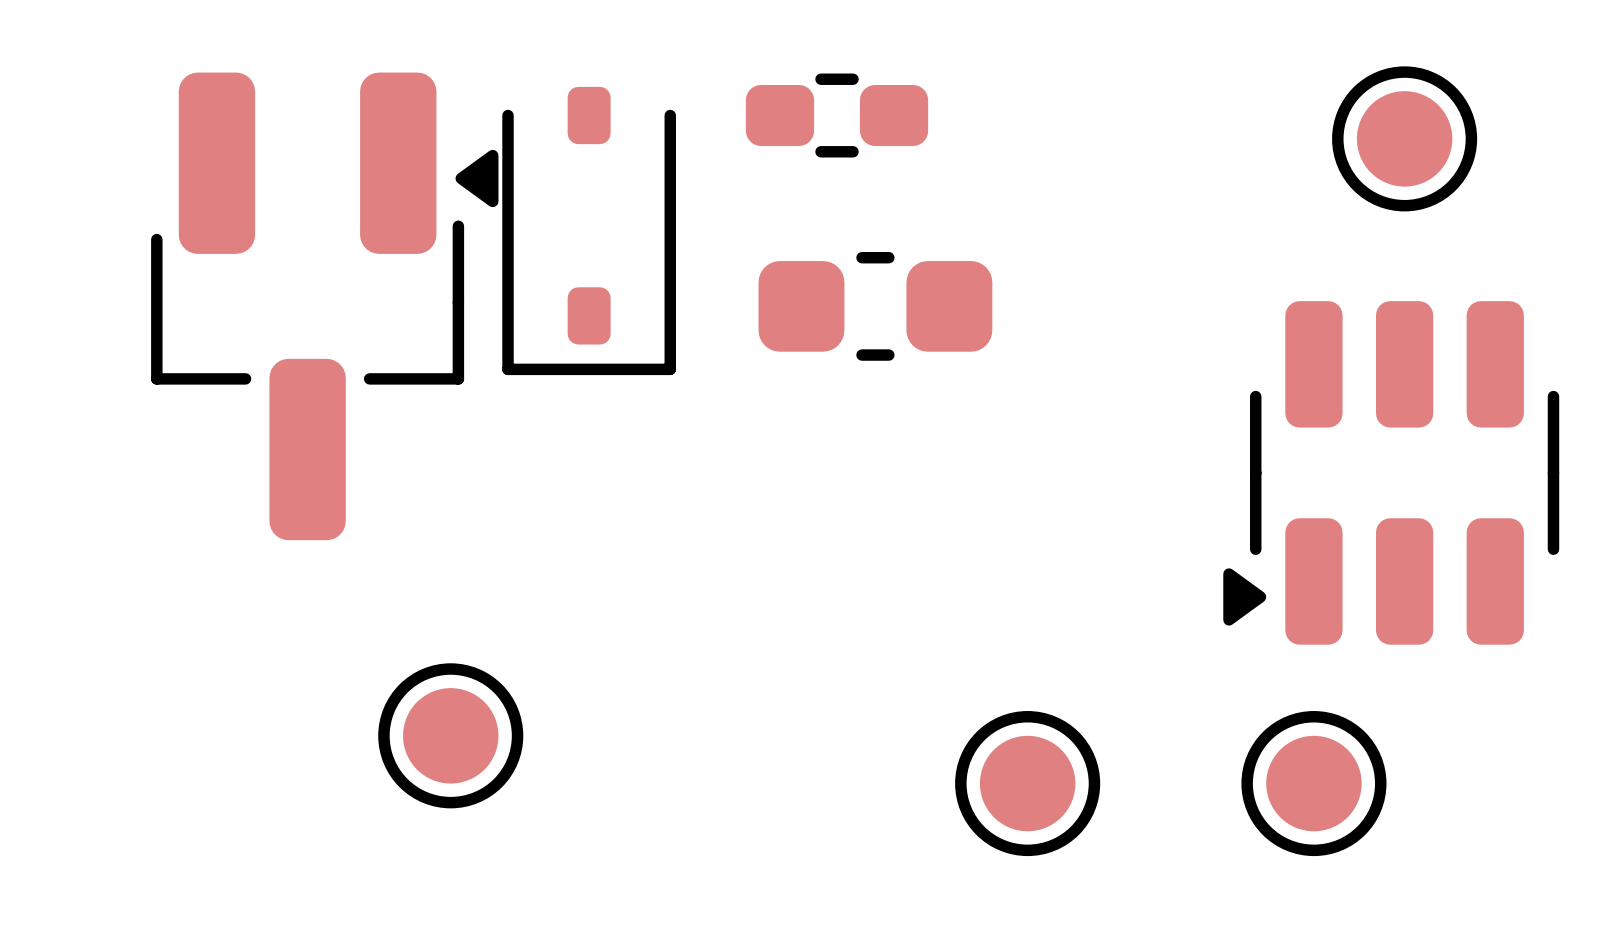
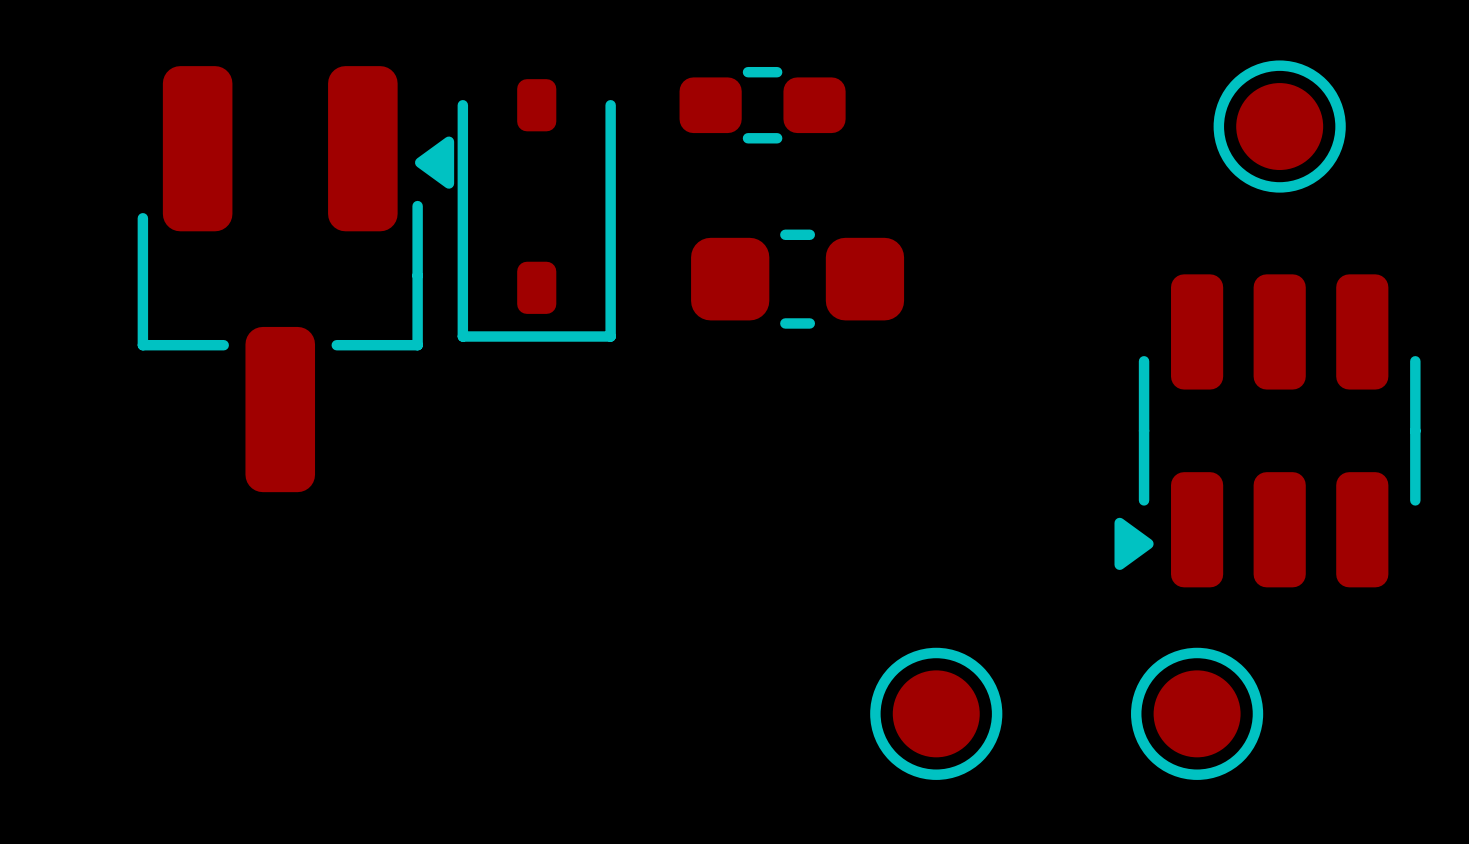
part: (450, 735) -> none

